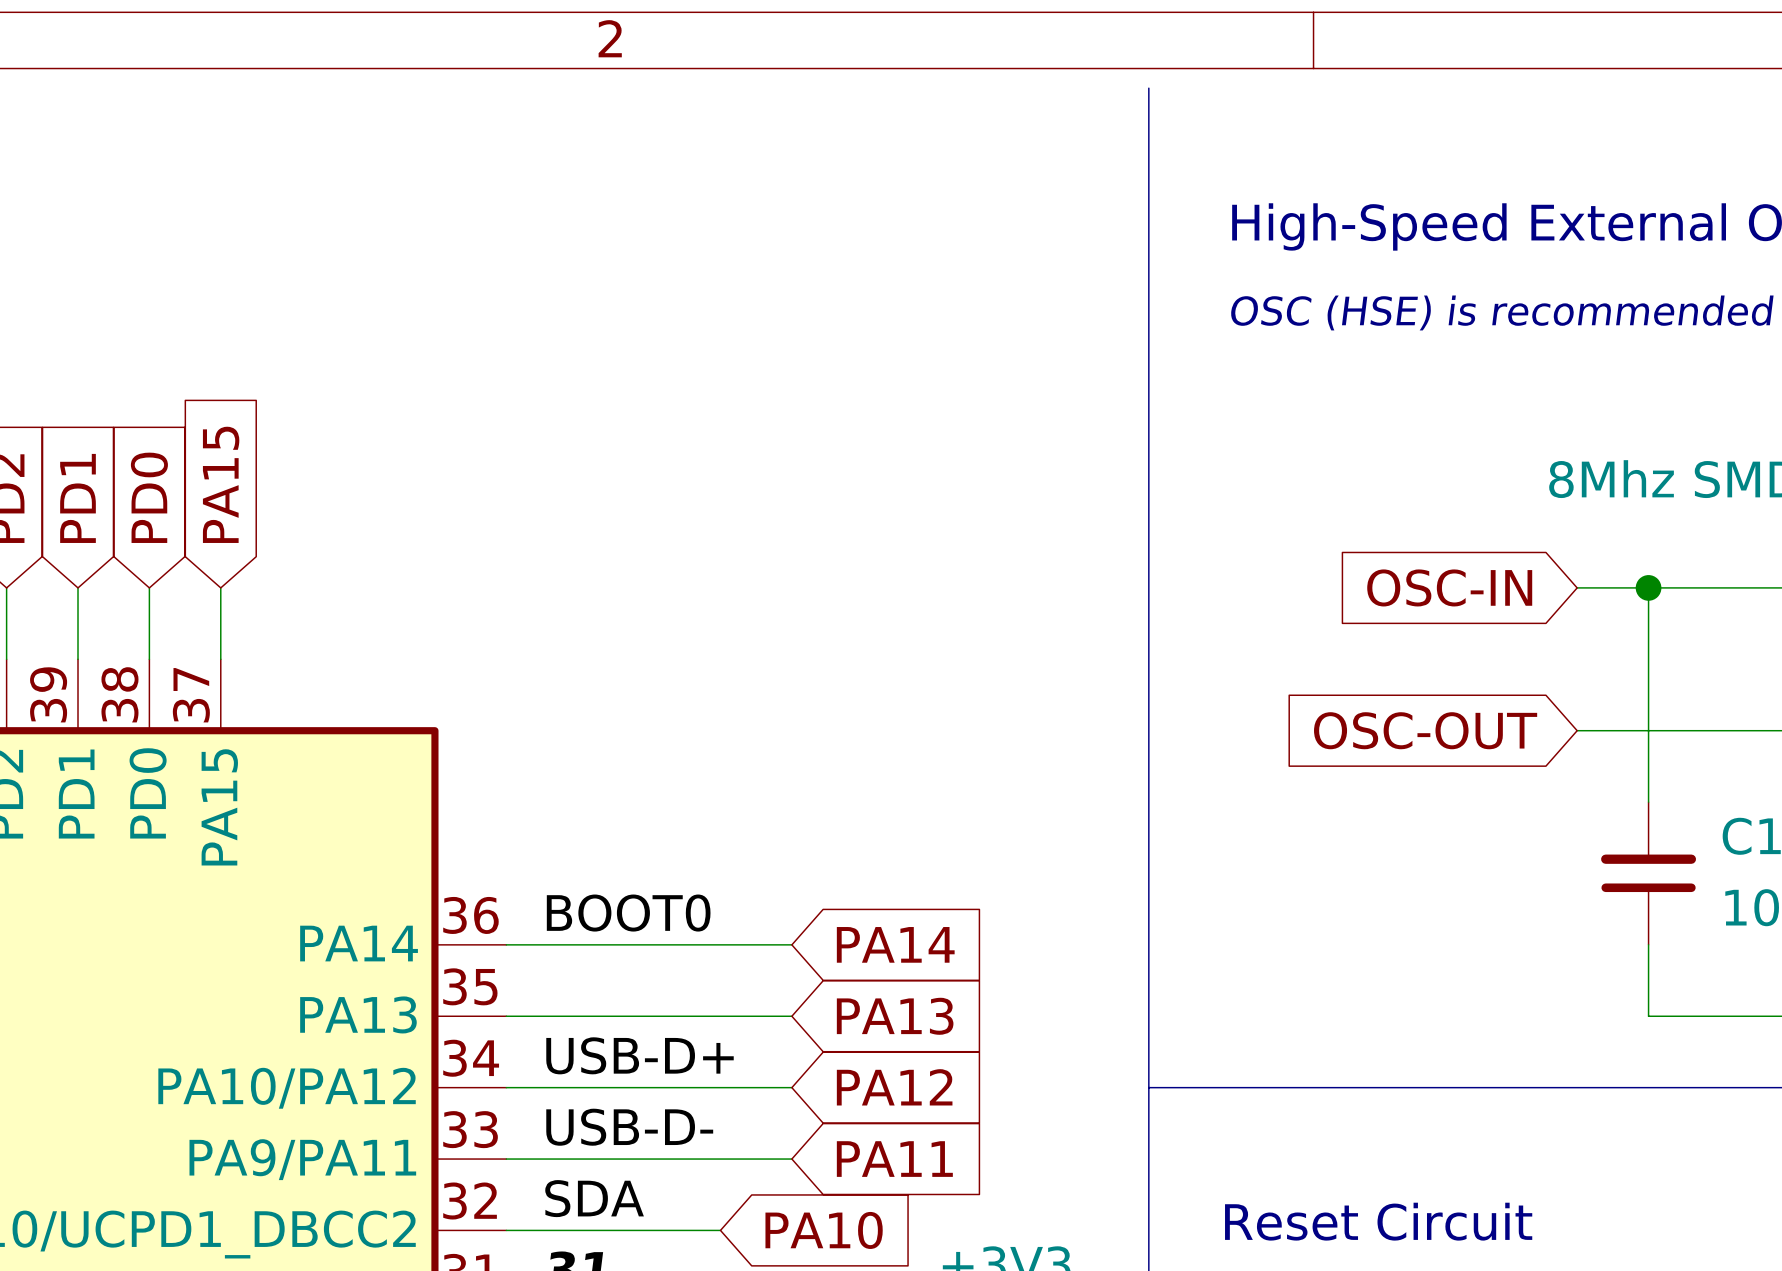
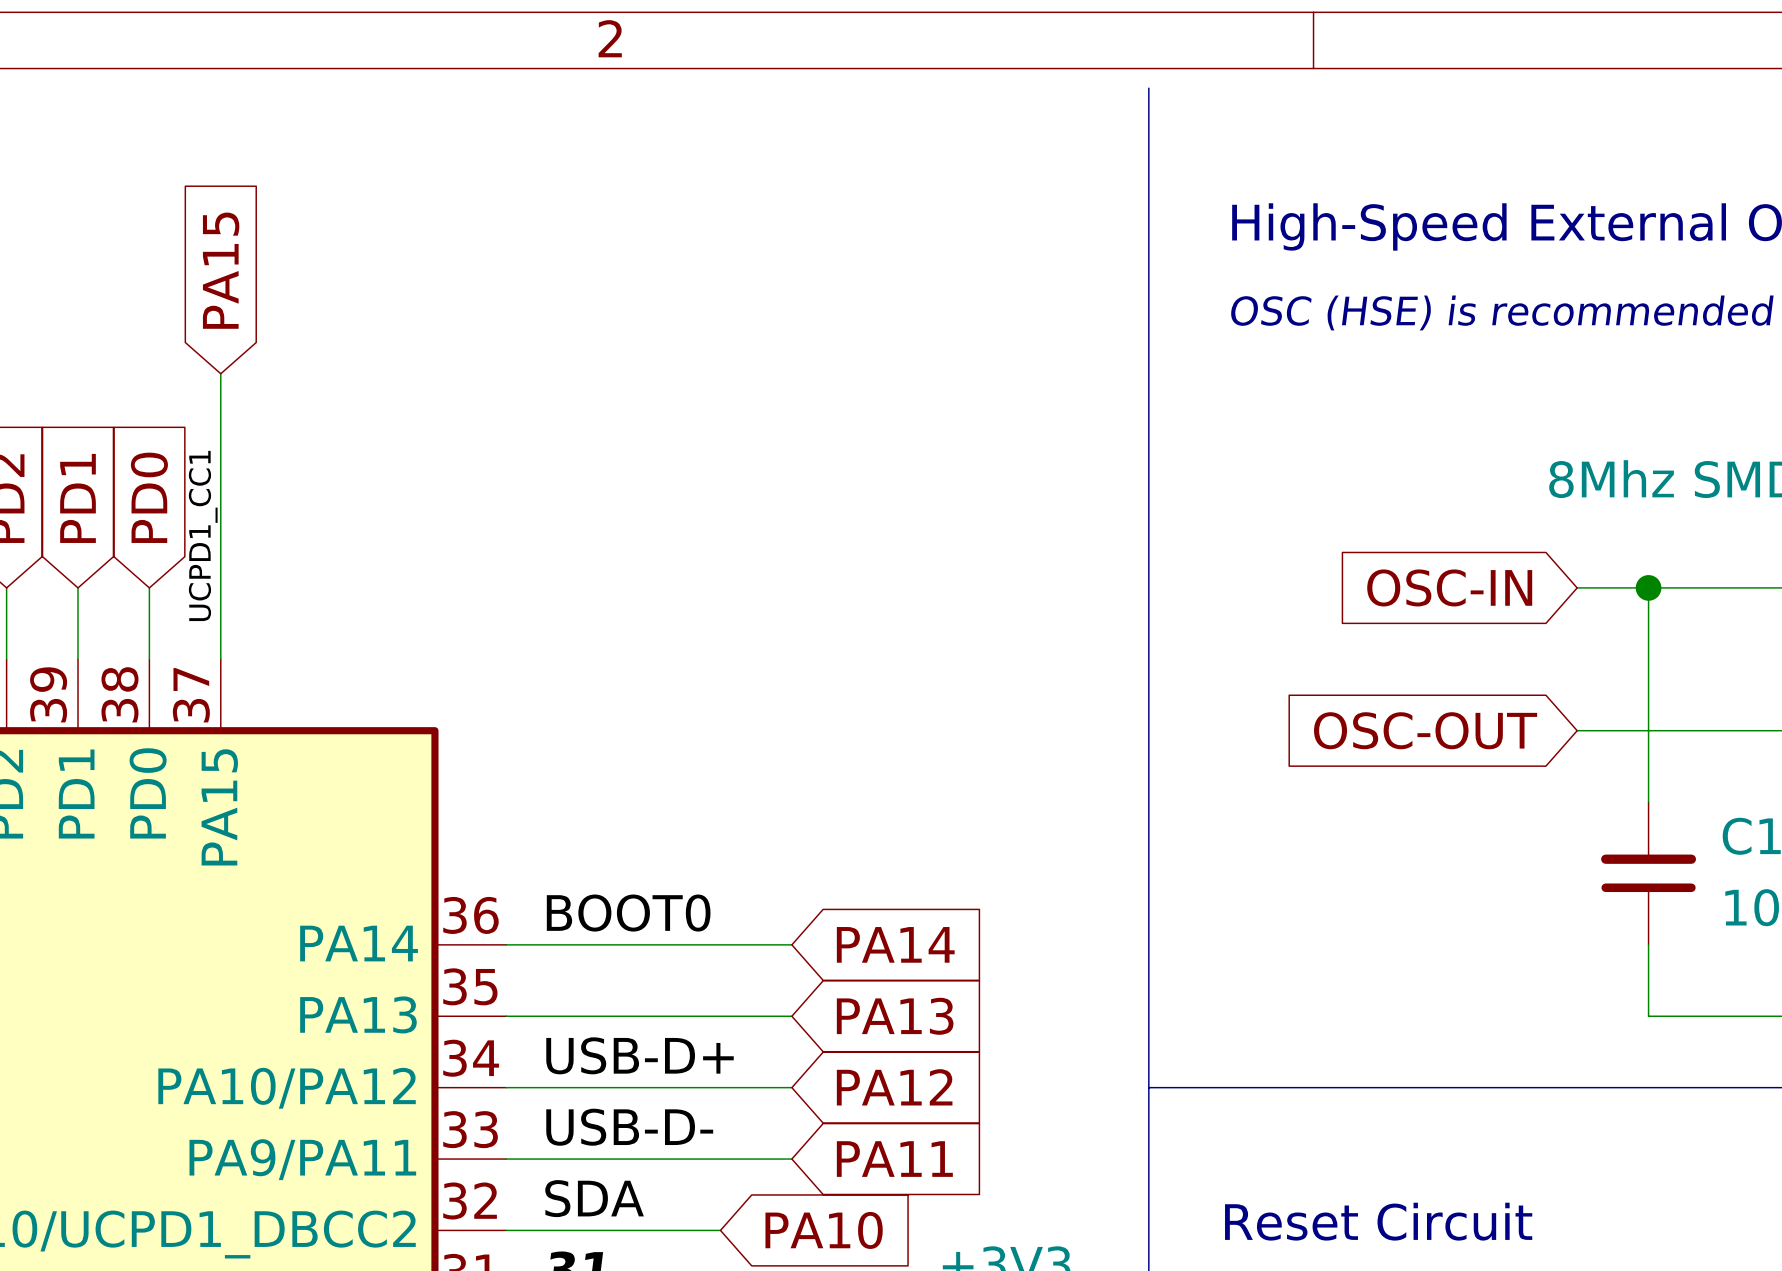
wire: none -> (220, 373) (220, 587)
global label position: PA15 (221, 484) -> PA15 (221, 270)
label: none -> UCPD1_CC1 (203, 535)

